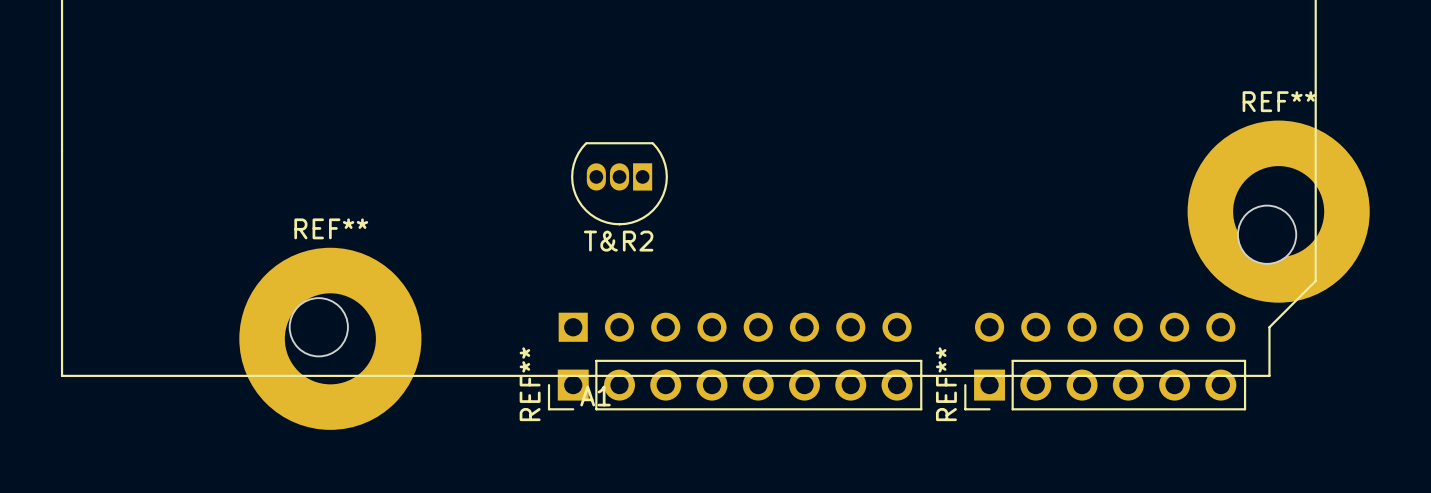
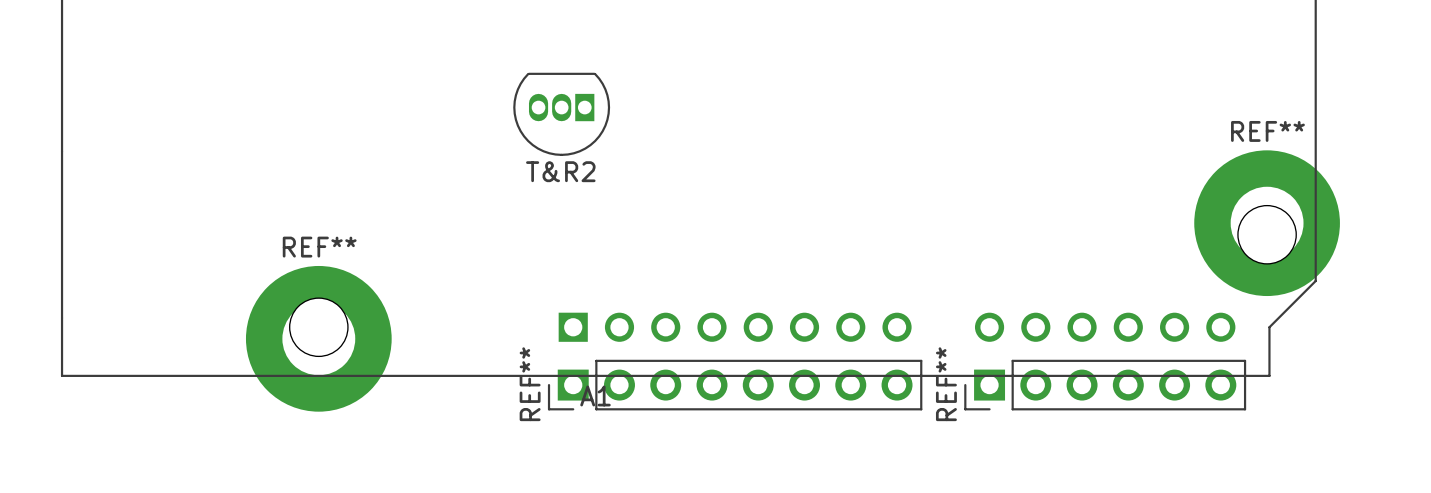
REF** footprint: [1187, 120, 1370, 303] -> [1194, 150, 1340, 297]
T&R2 position: (619, 183) -> (561, 114)
REF** footprint: [239, 247, 422, 430] -> [245, 265, 392, 412]

